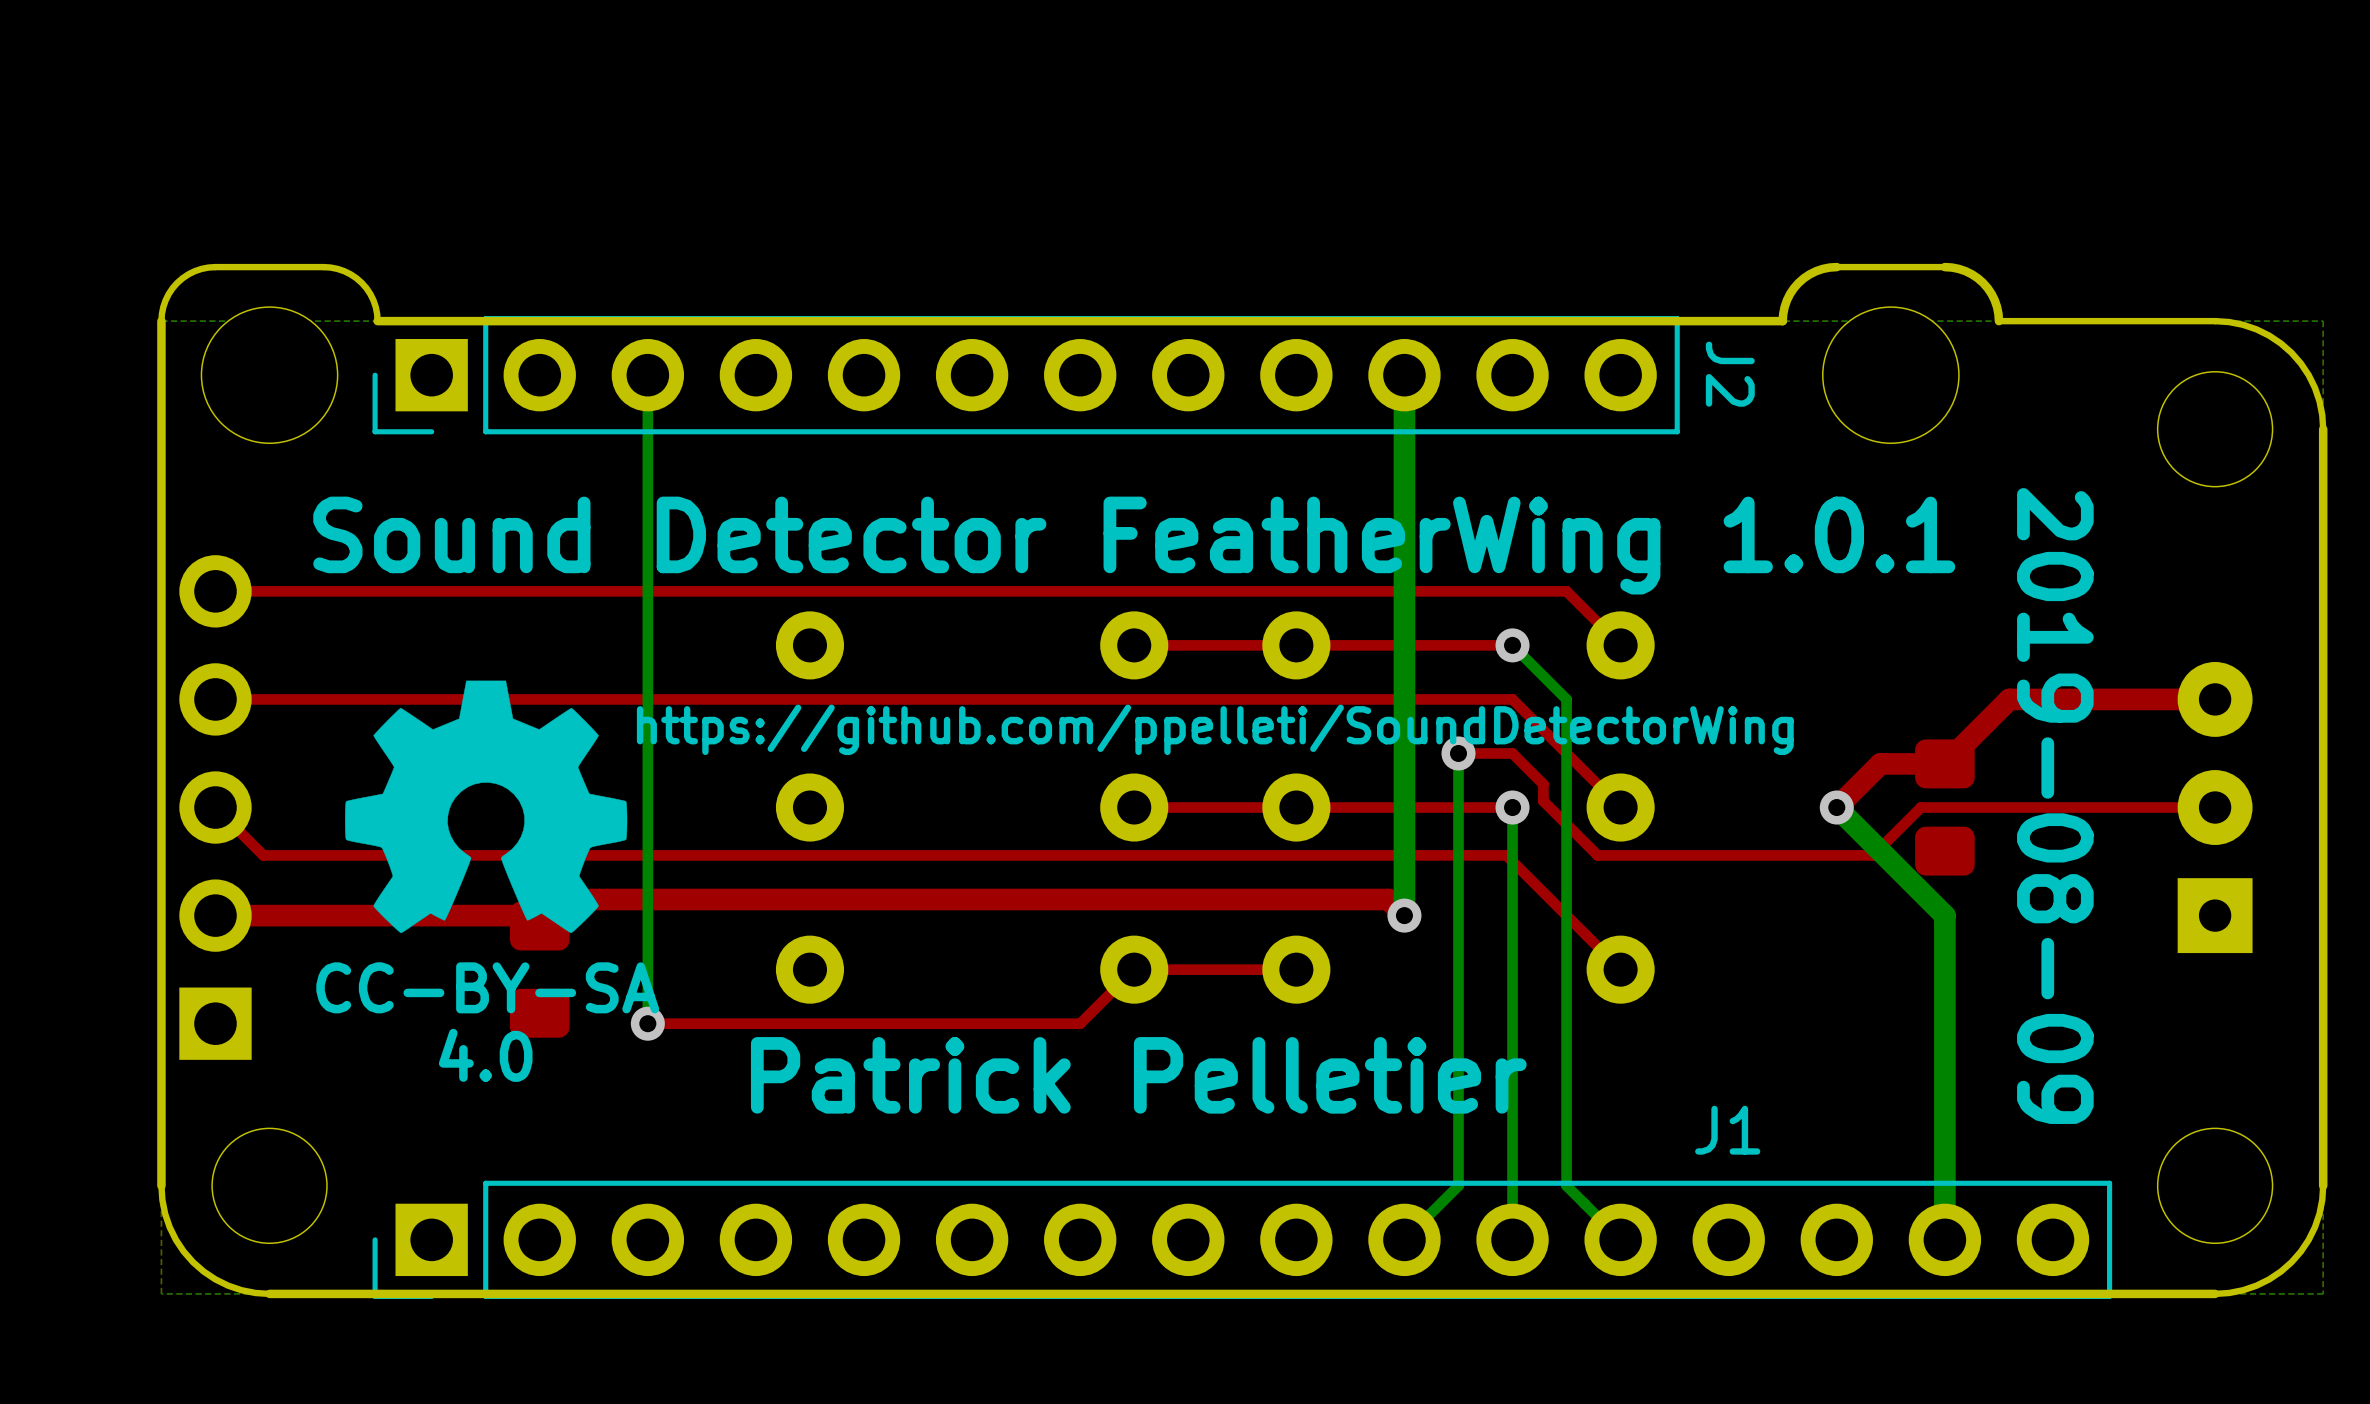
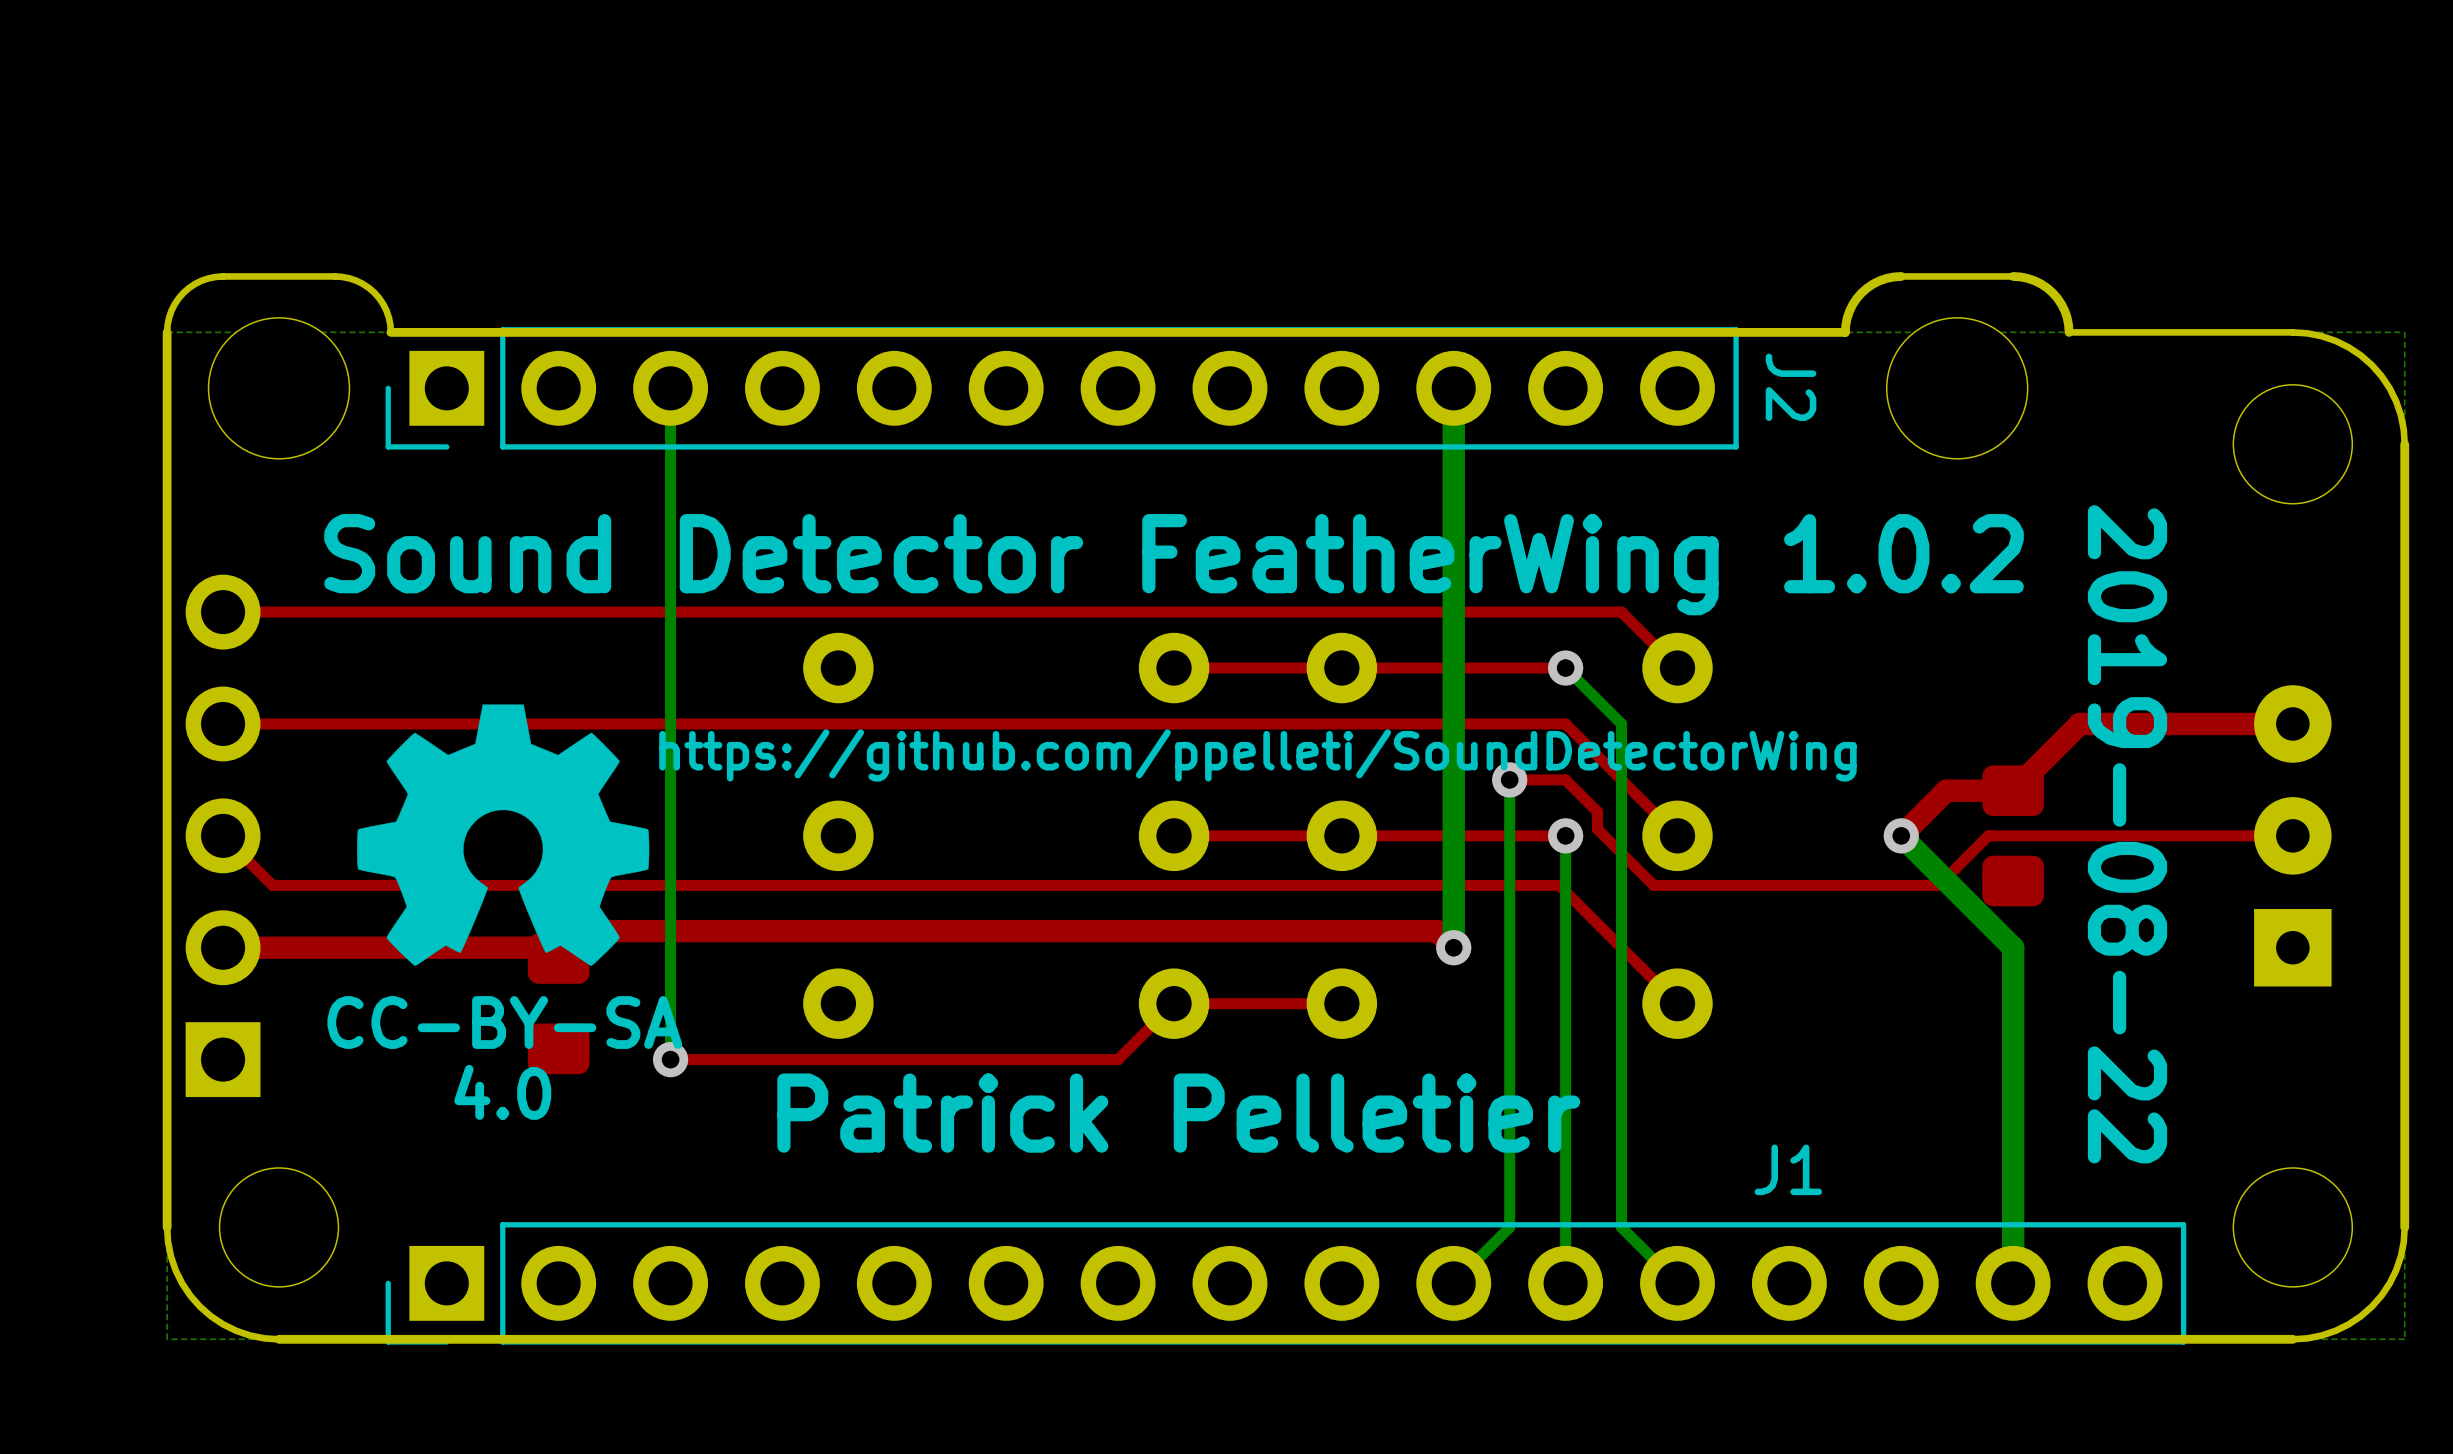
text: Sound Detector FeatherWing 1.0.1 (1134, 545) -> Sound Detector FeatherWing 1.0.2 (1174, 564)
text: 2019-08-09 (2055, 806) -> 2019-08-22 (2127, 834)

